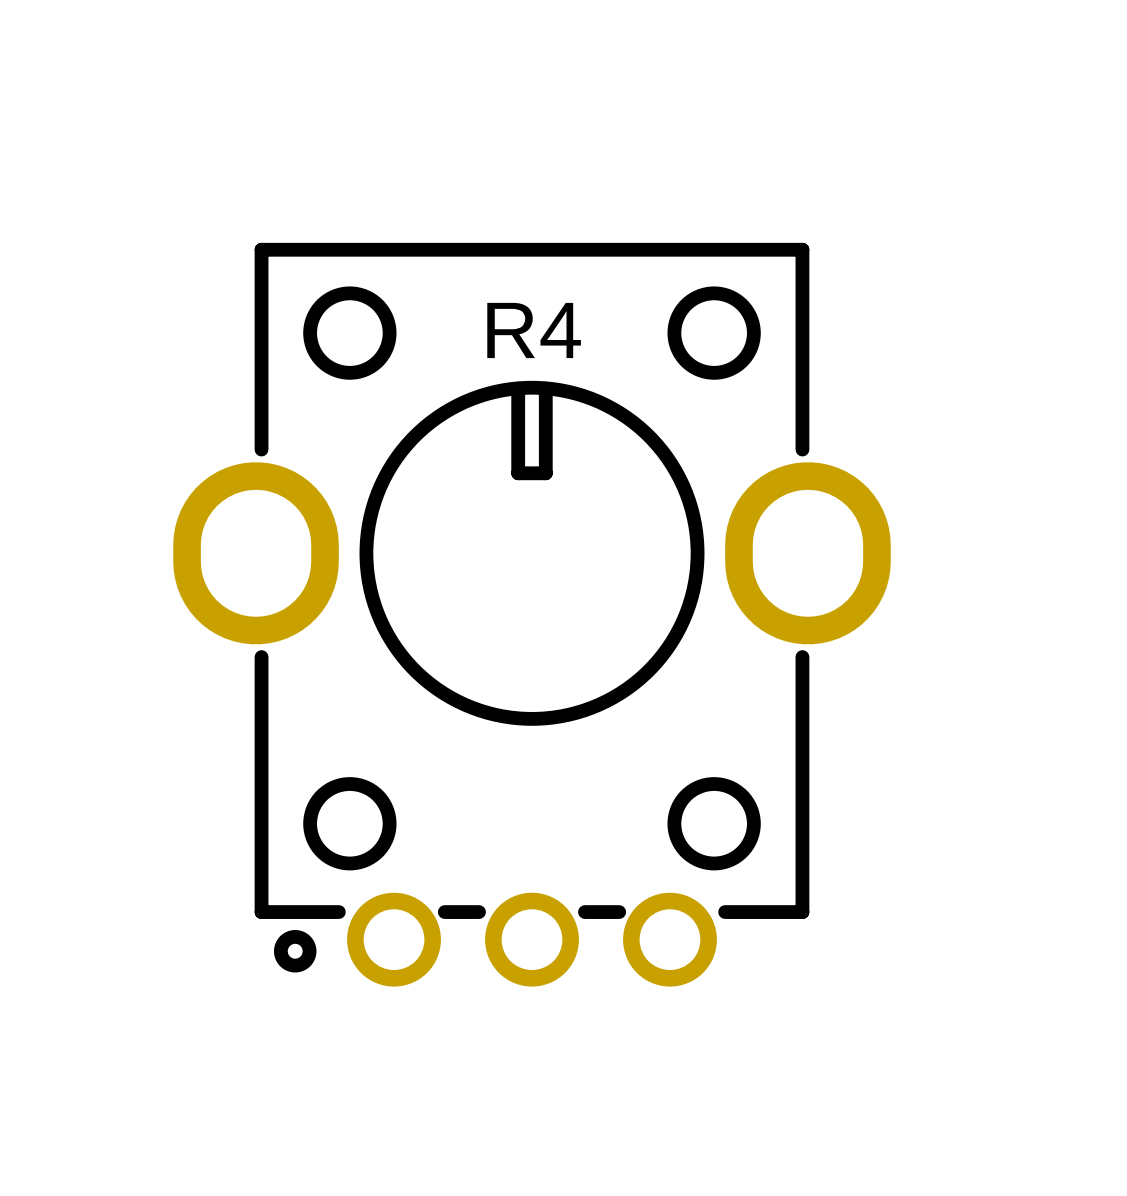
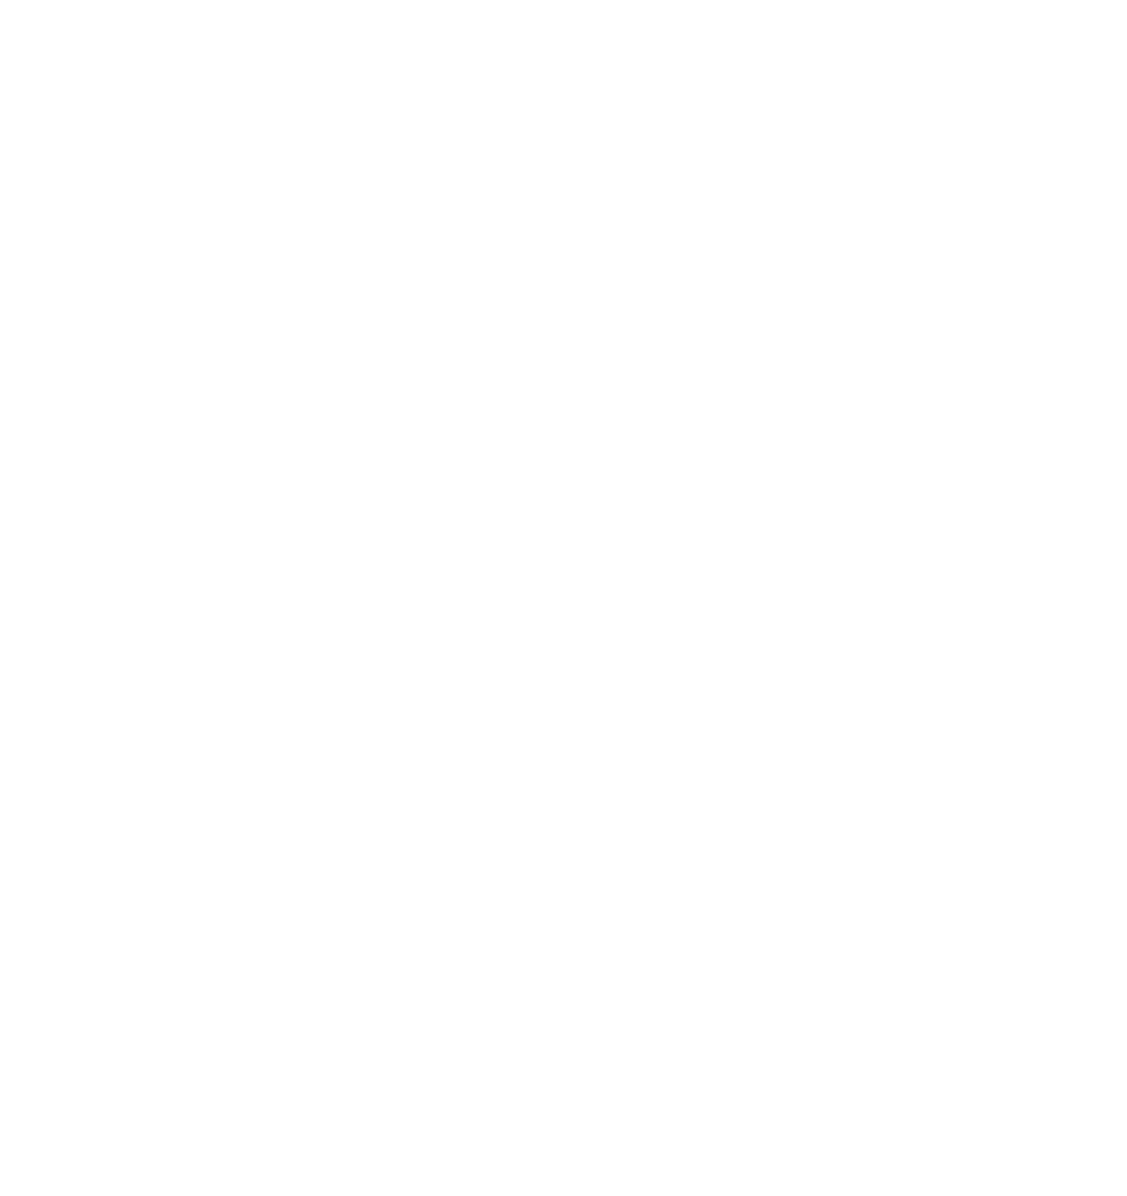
R4: (531, 614) -> none

